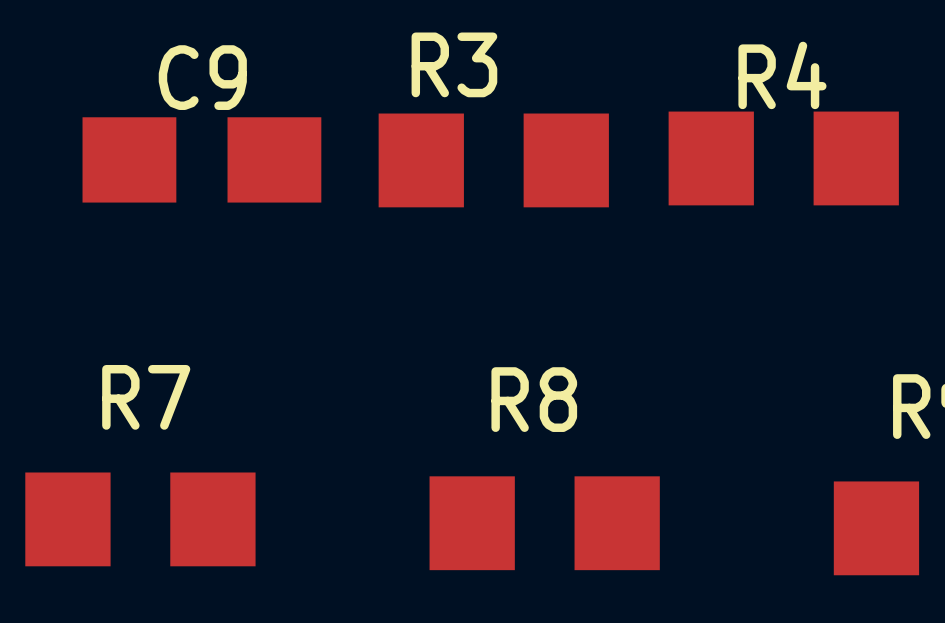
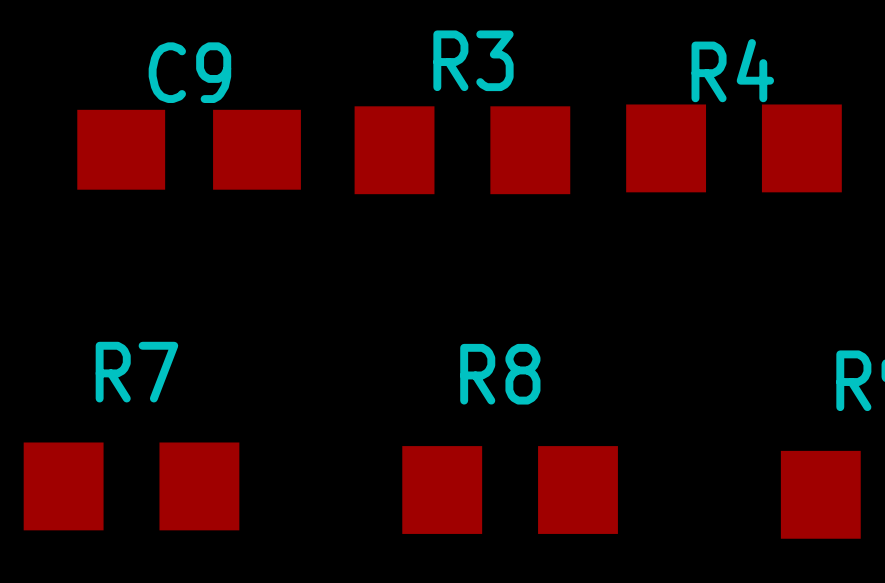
R3 name position: R3 (454, 64) -> R3 (473, 60)

